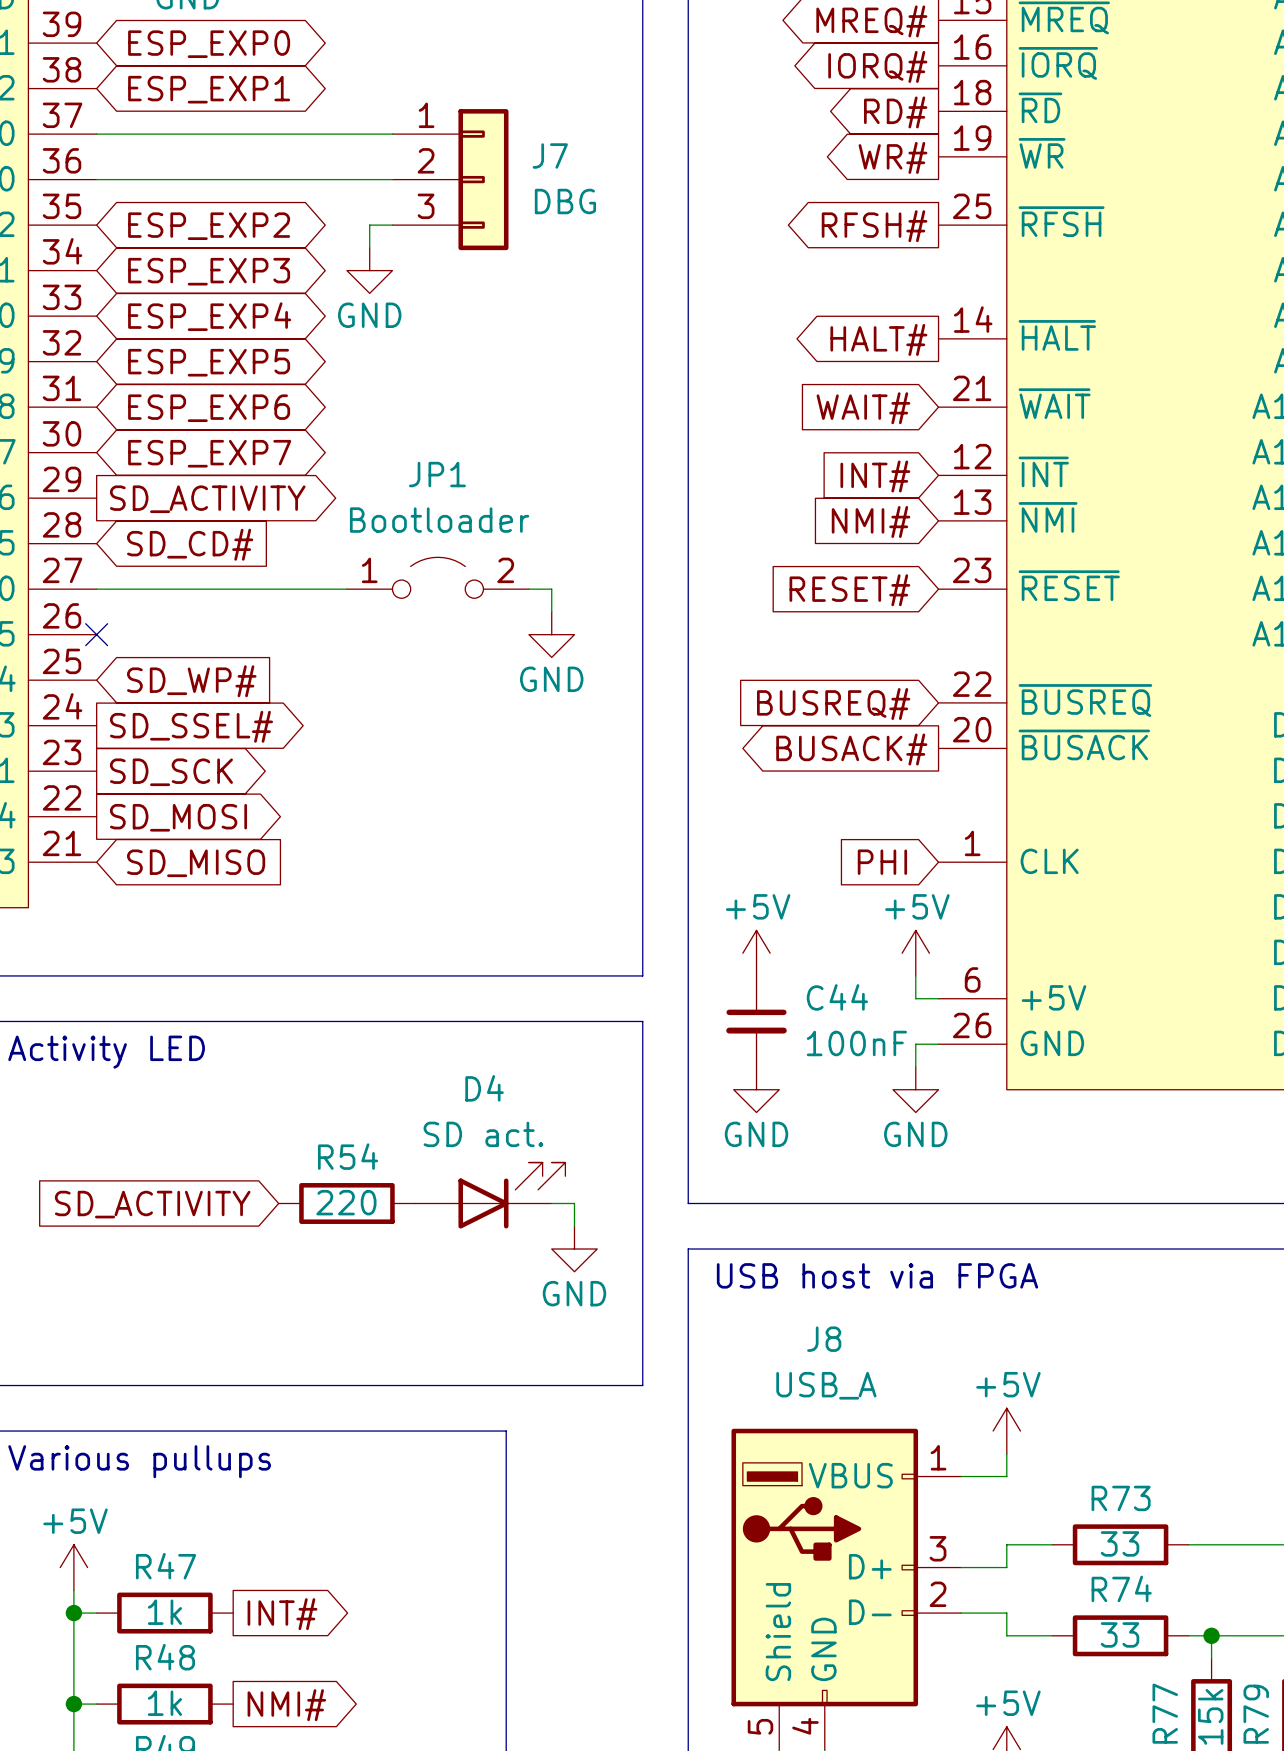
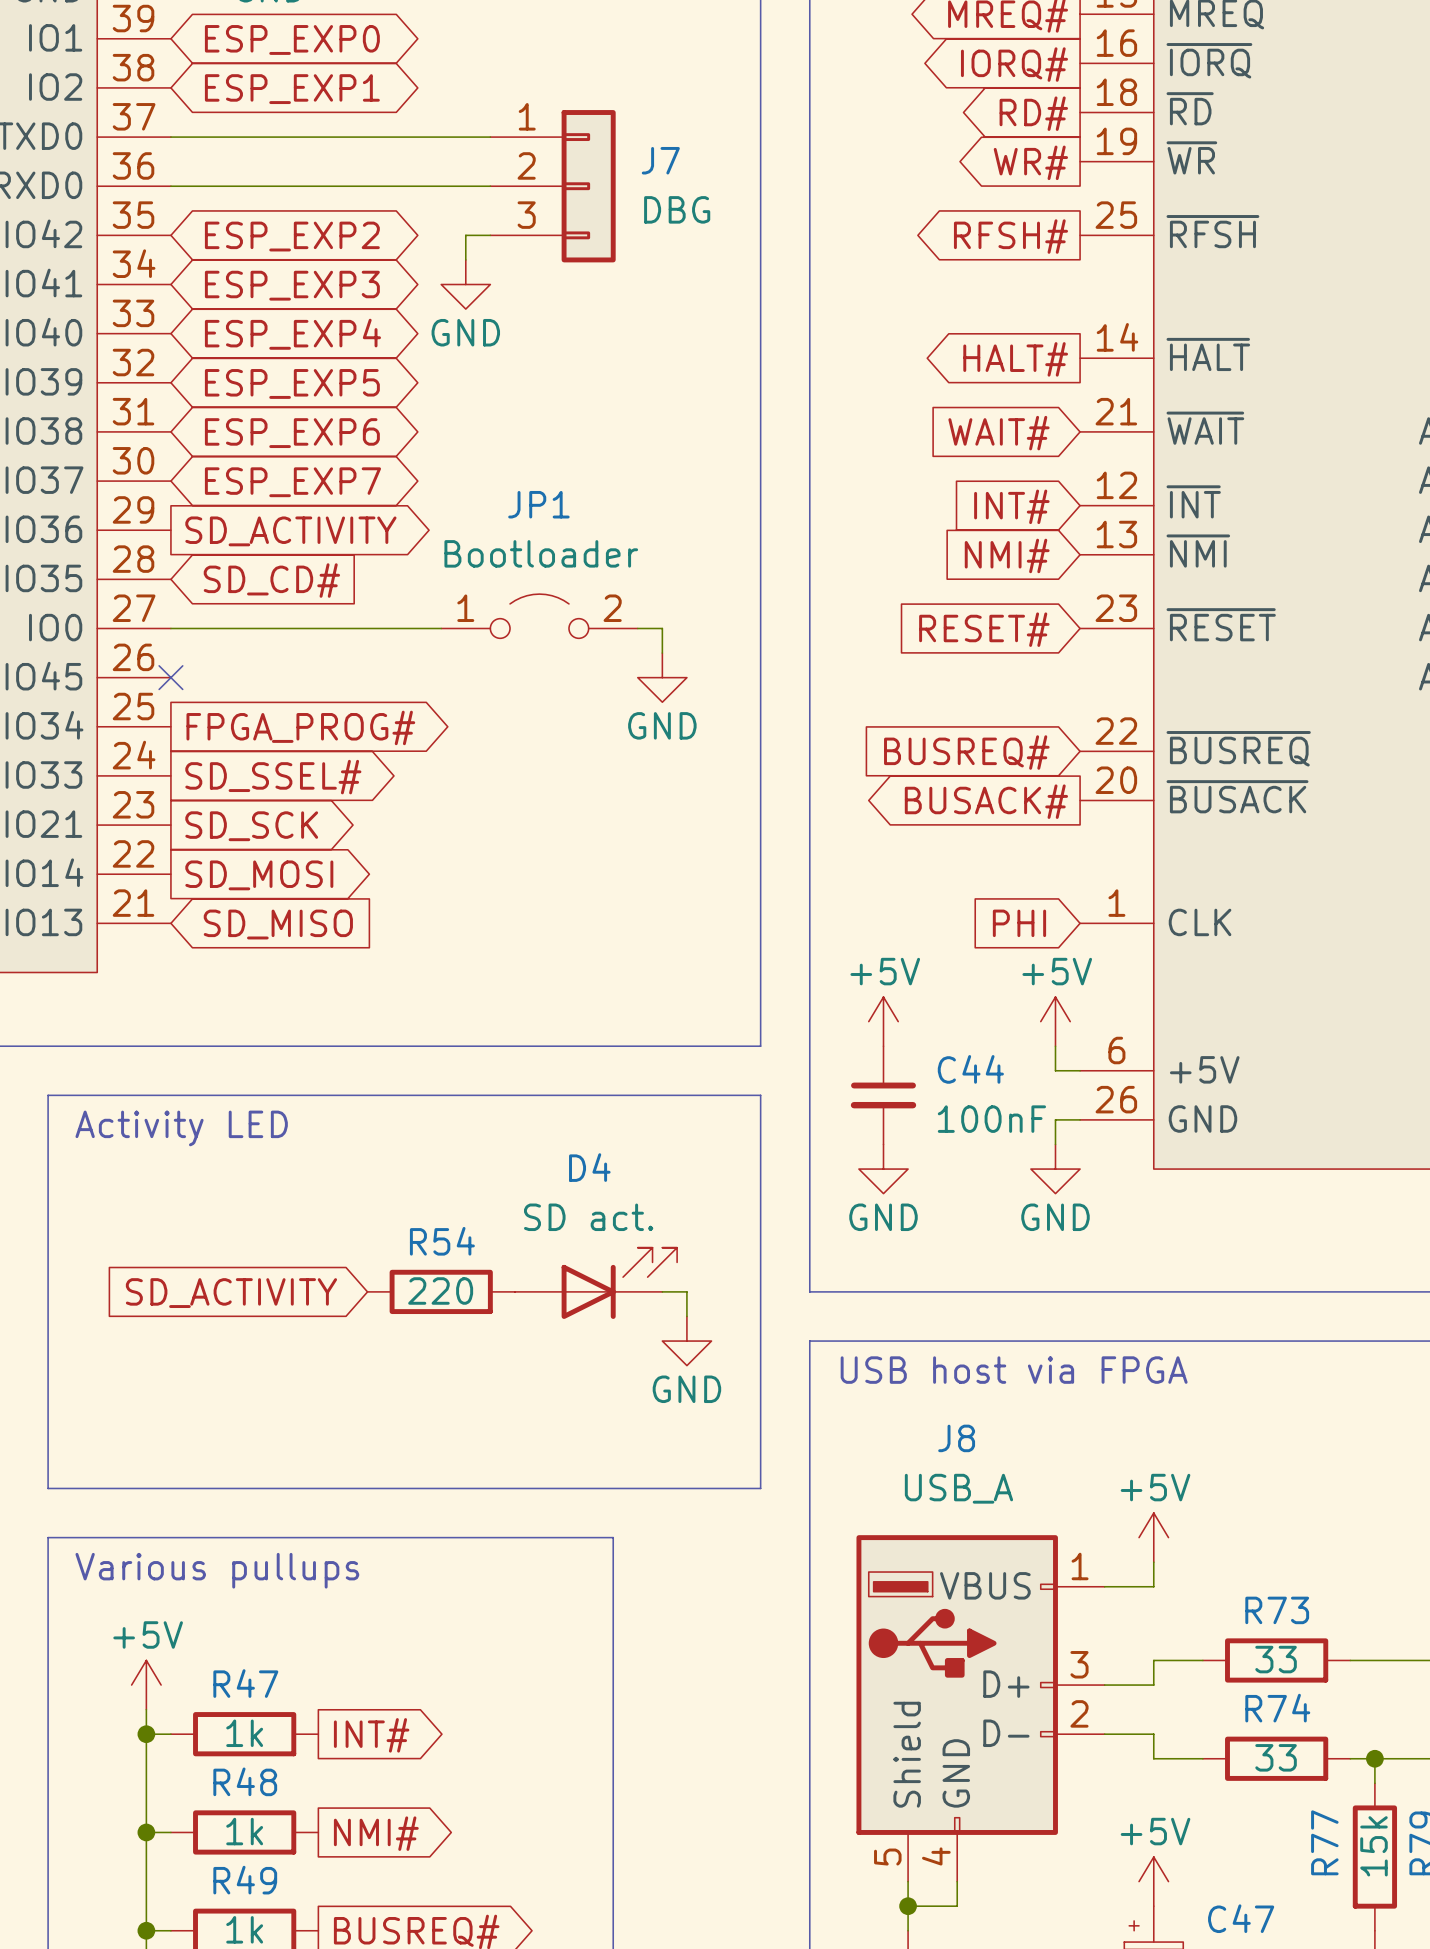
global label shape: input (191, 681) -> output (300, 727)
global label: SD_WP# (191, 681) -> FPGA_PROG# (300, 727)

